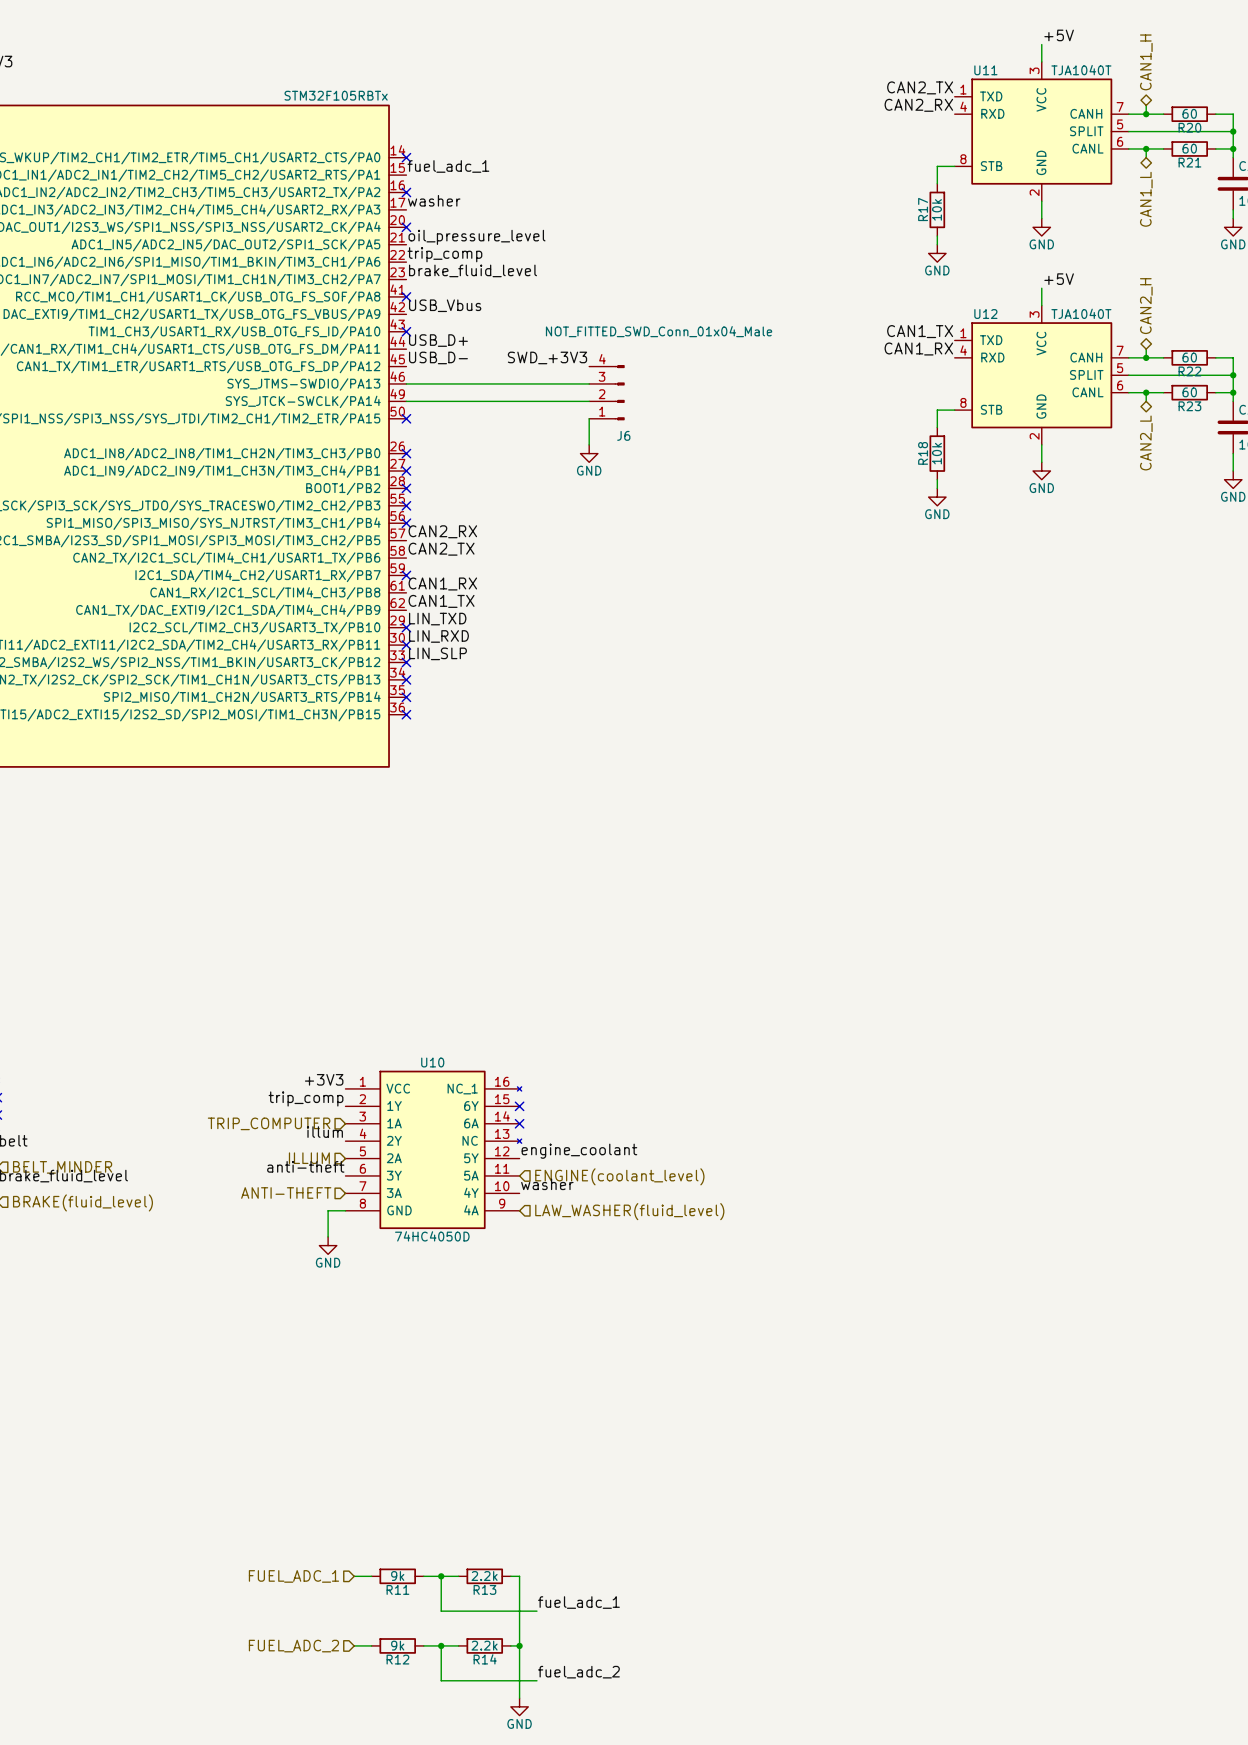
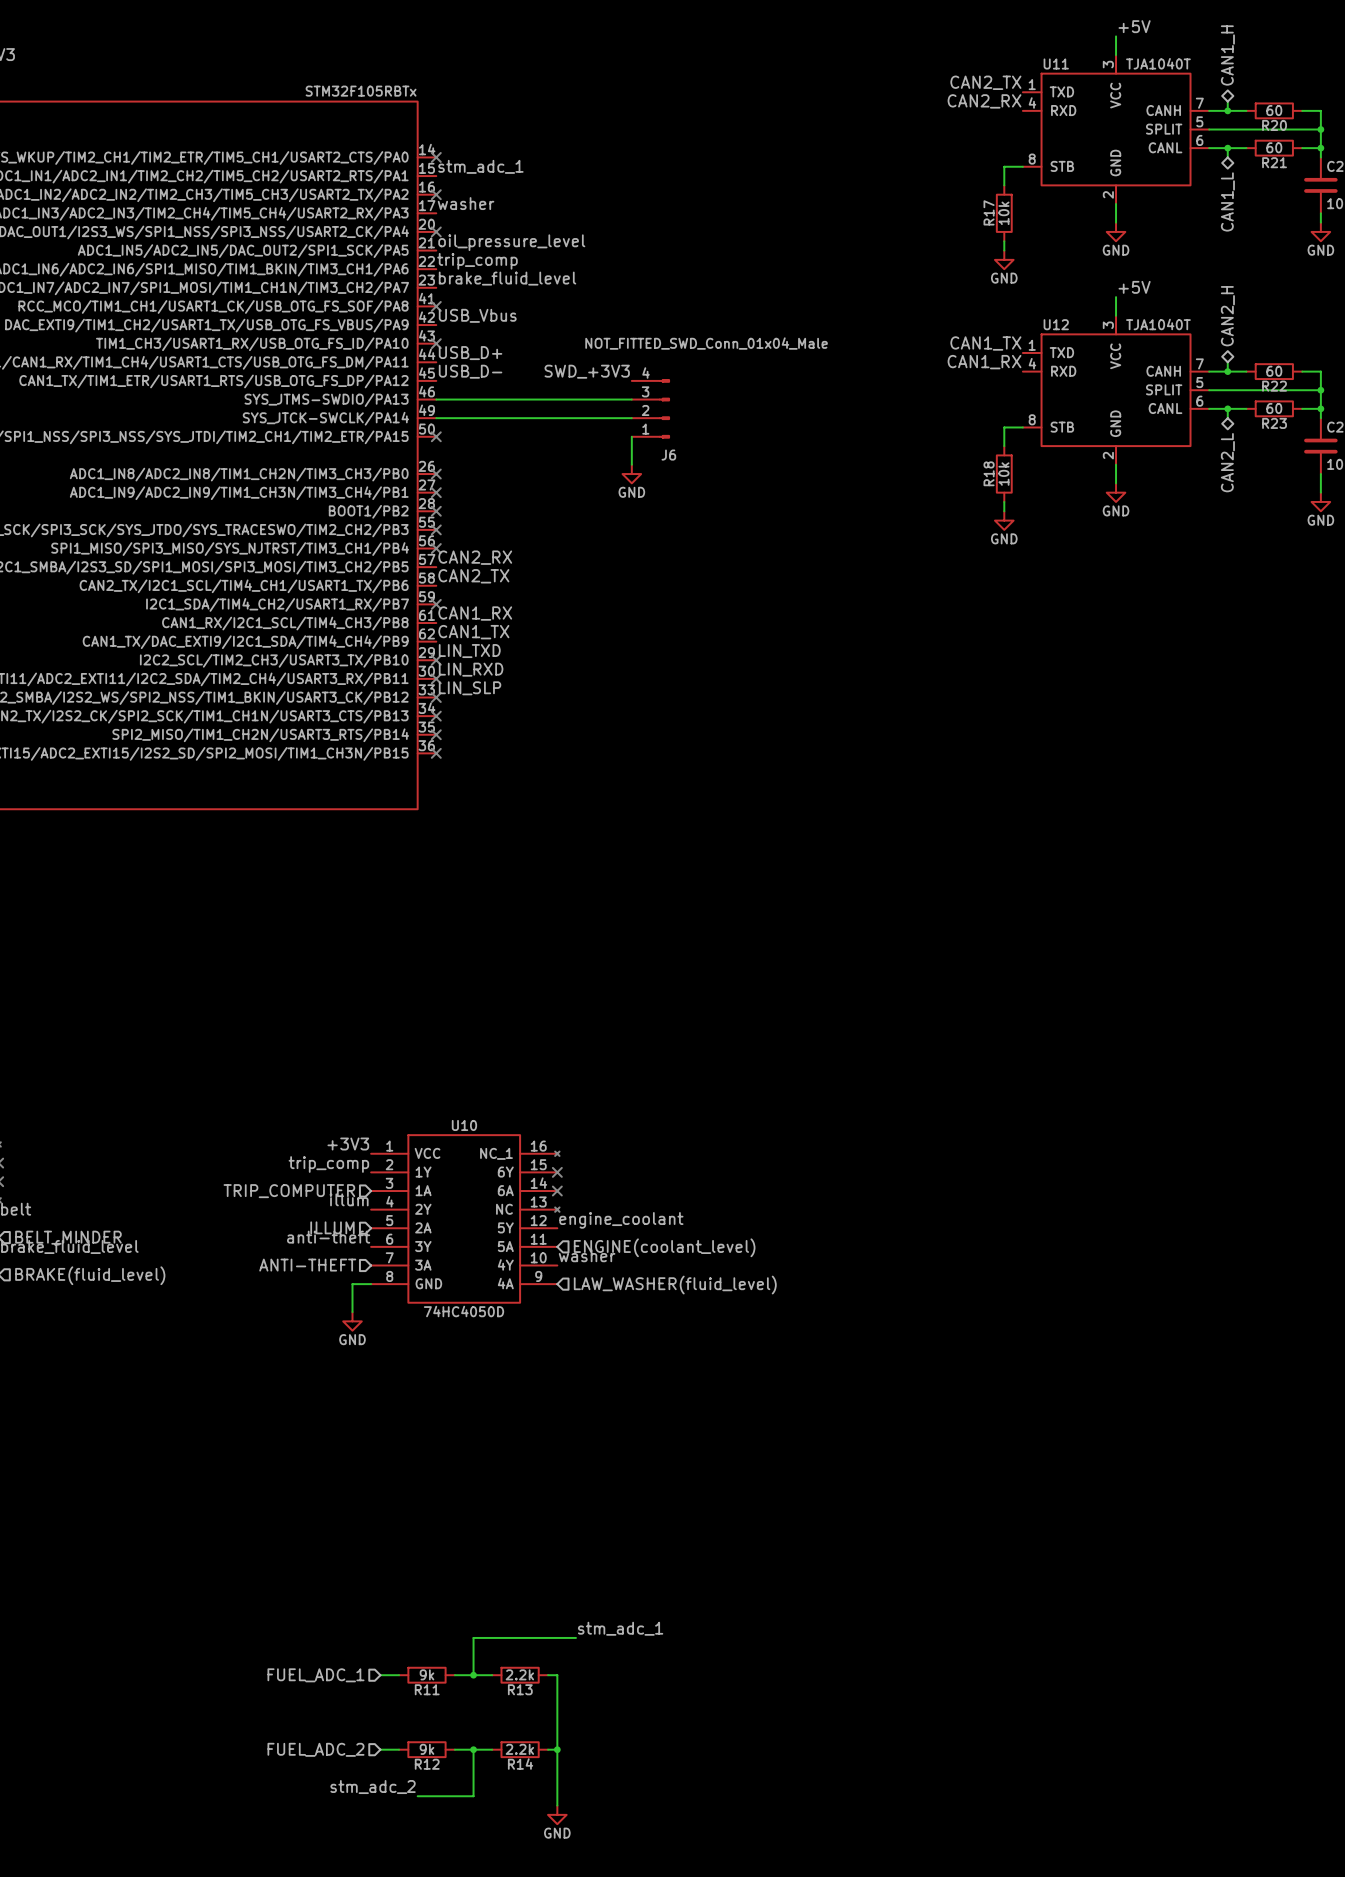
label: fuel_adc_1 (448, 166) -> stm_adc_1 (480, 166)
label: none -> stm_adc_1 (620, 1628)
wire: (441, 1576) (441, 1611) (536, 1611) -> (473, 1675) (473, 1637) (575, 1637)
label: fuel_adc_1 (578, 1602) -> none
label: fuel_adc_2 (578, 1672) -> none
label: none -> stm_adc_2 (373, 1787)
wire: (441, 1680) (536, 1680) -> (473, 1786) (473, 1796) (417, 1796)

